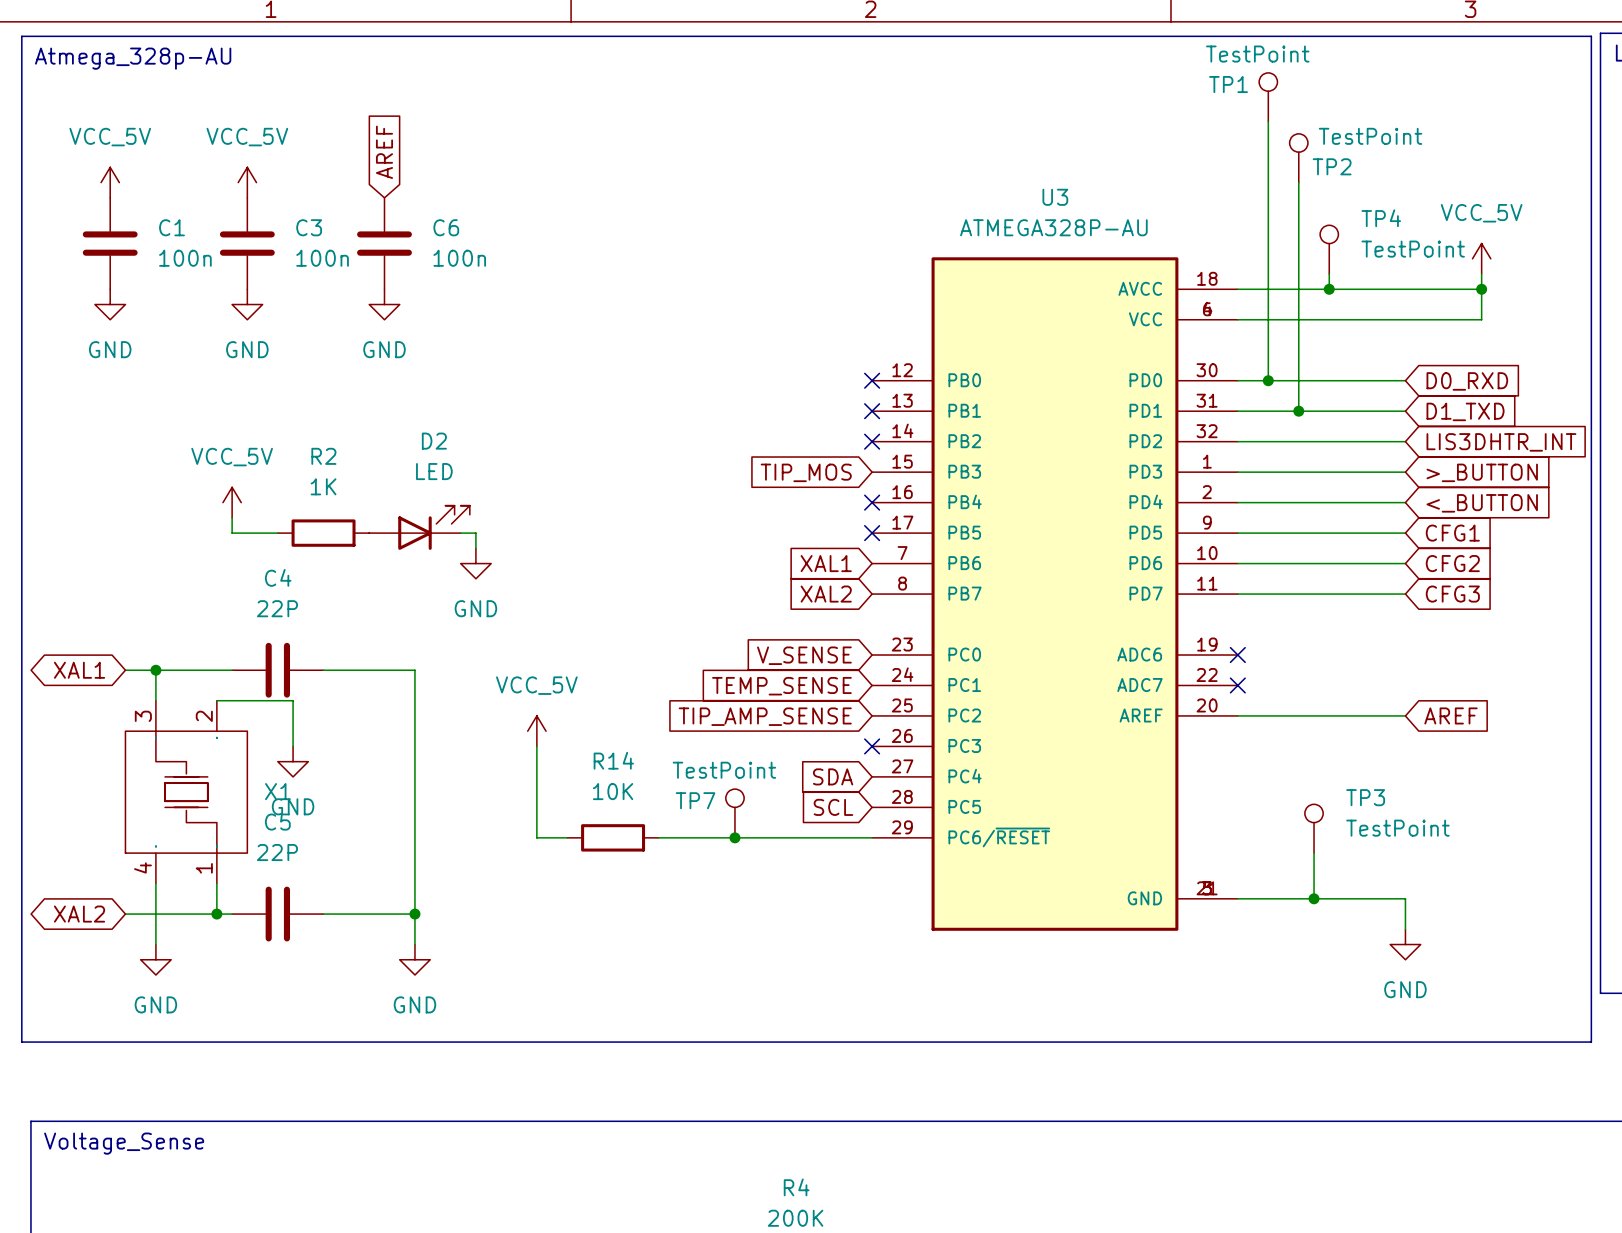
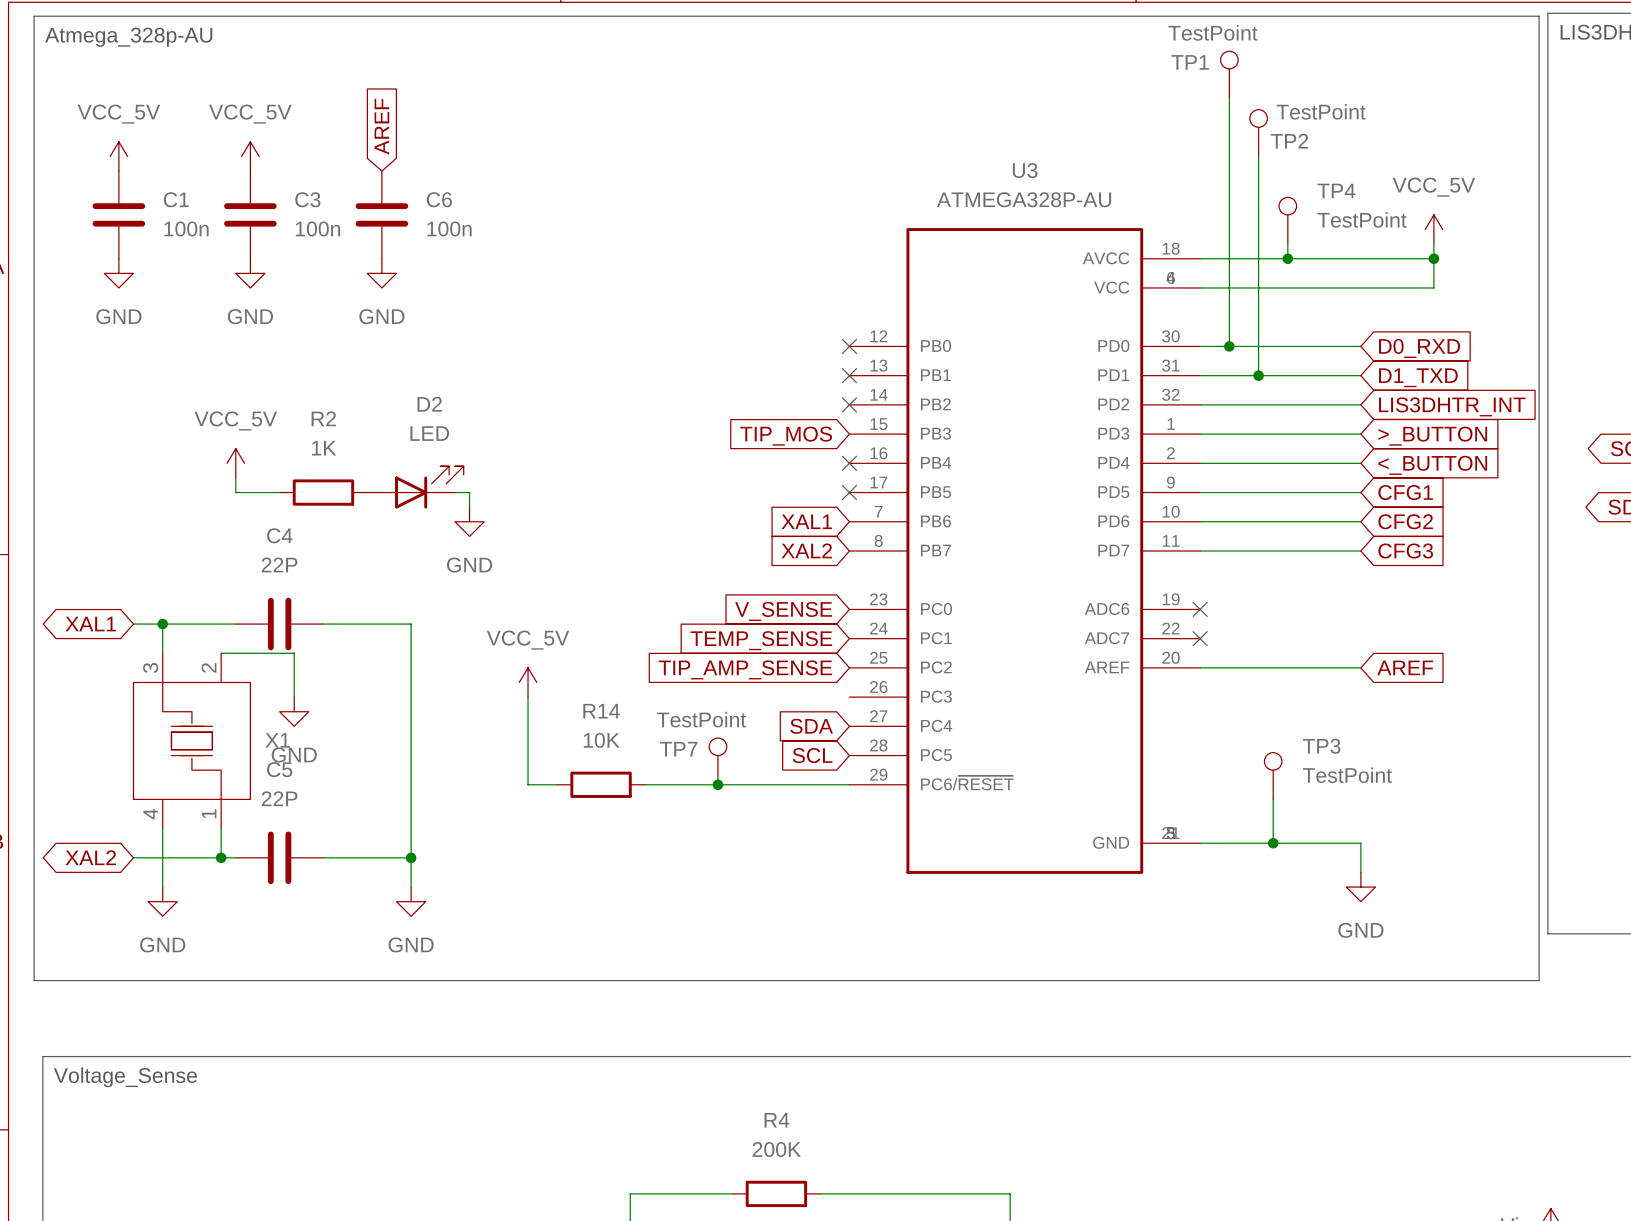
no-connect mark: (872, 746) -> none

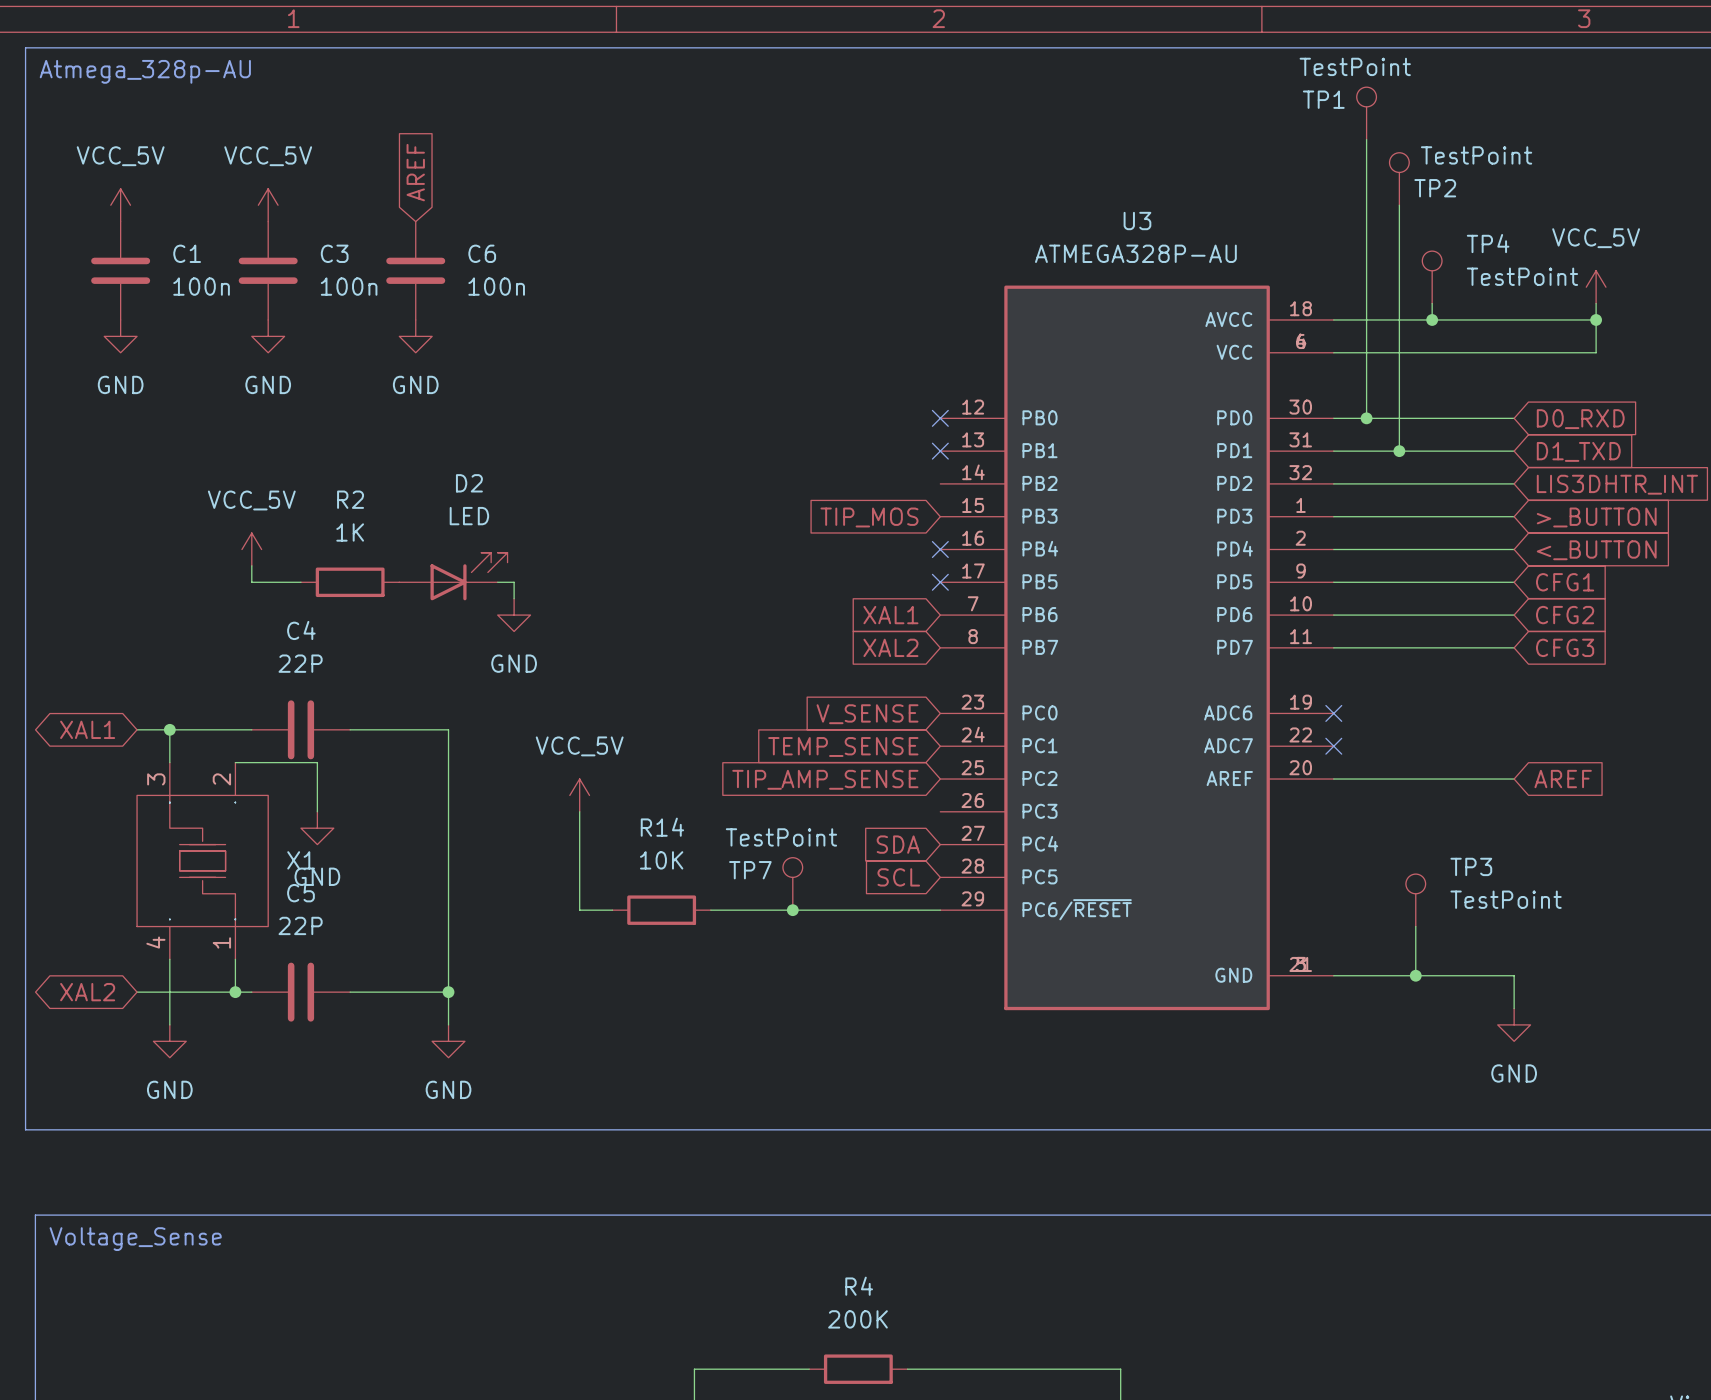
no-connect mark: (849, 404) -> none

